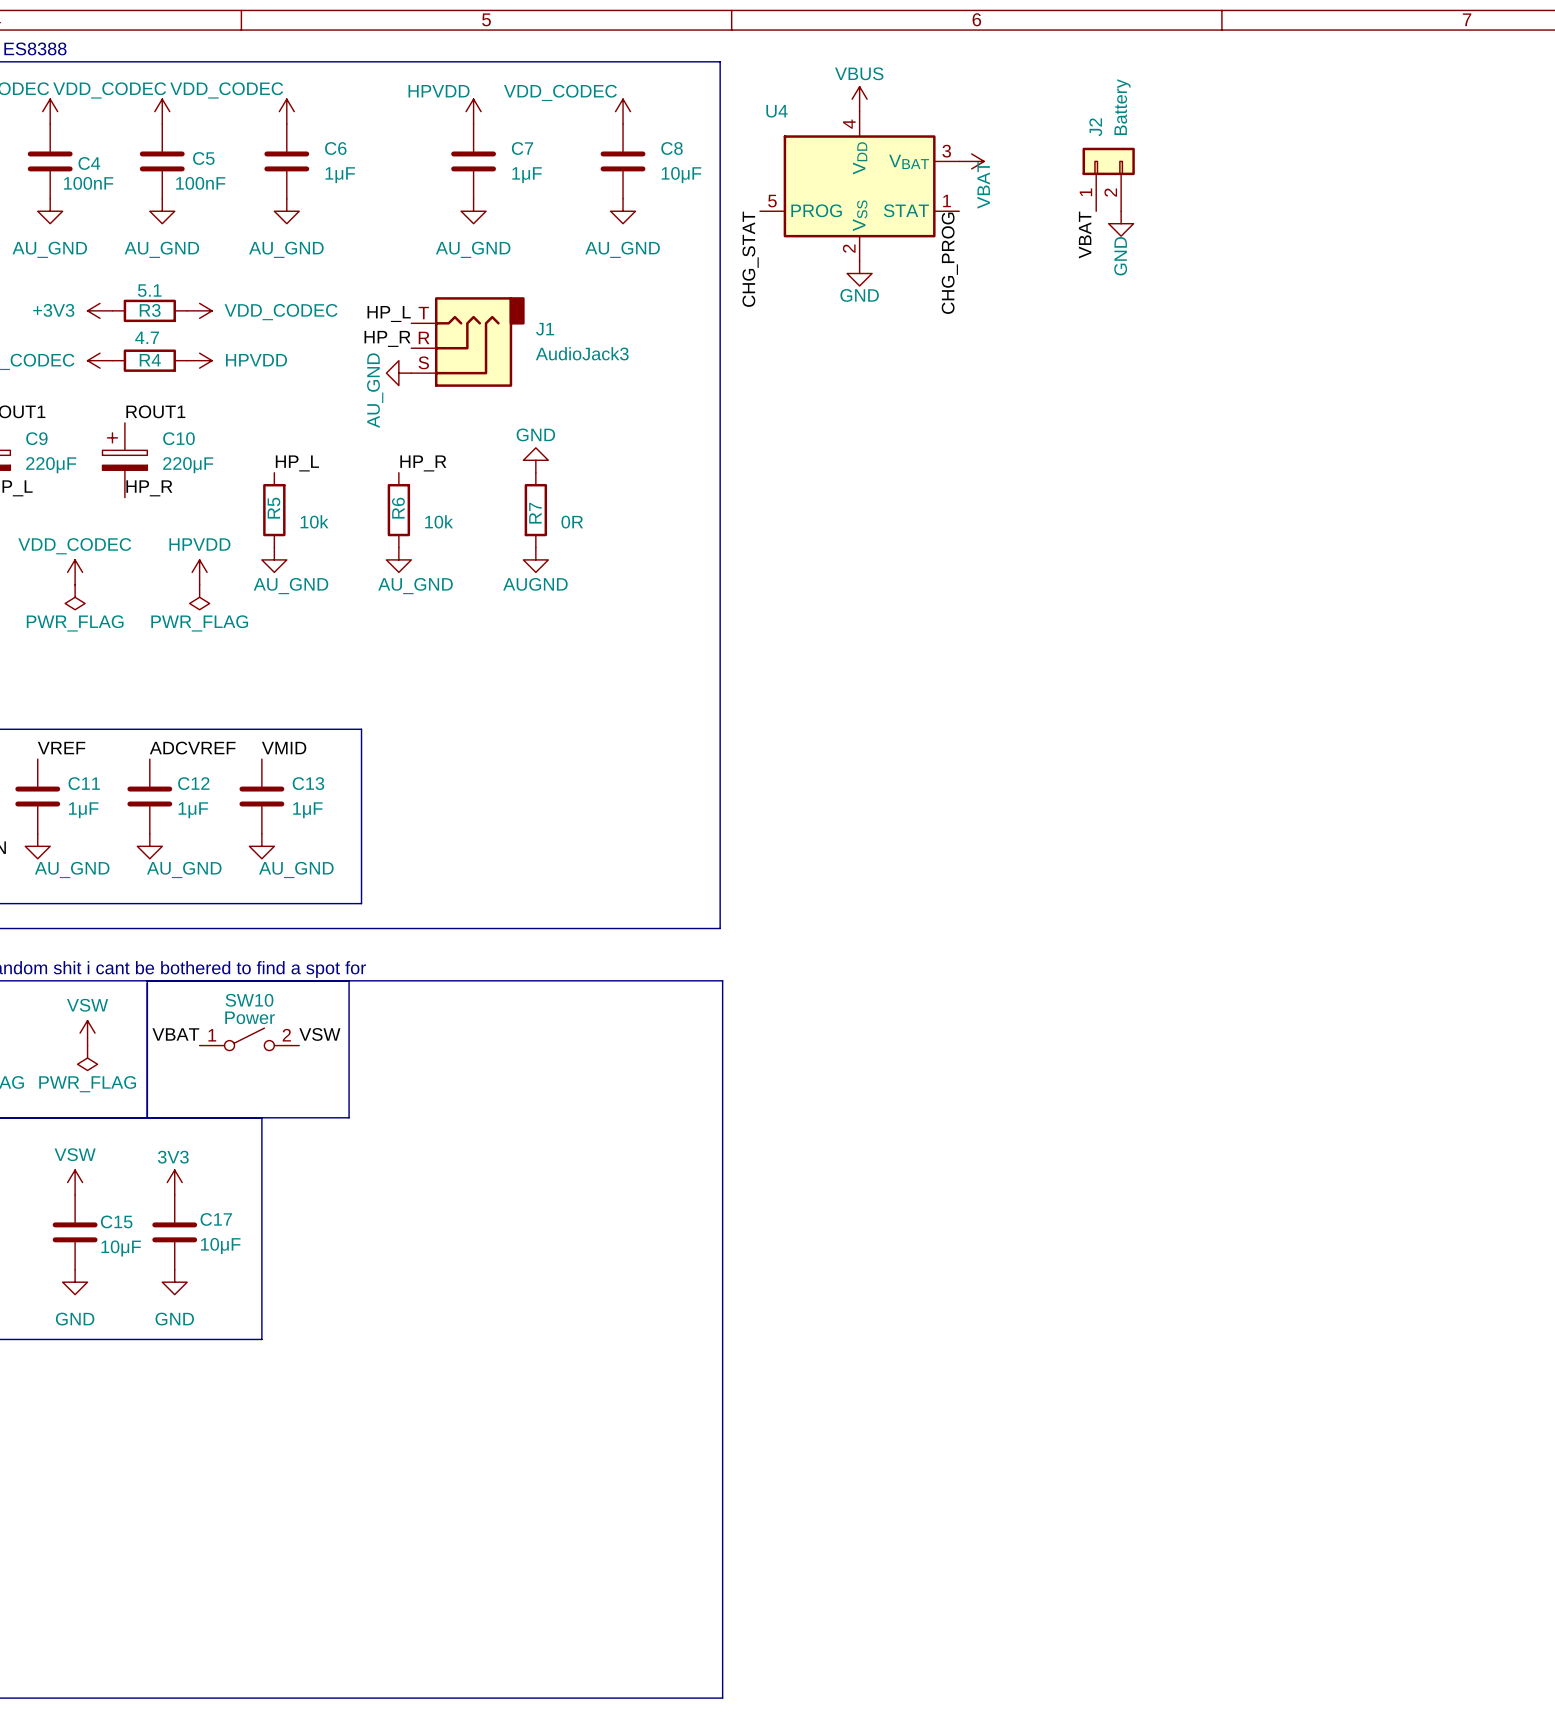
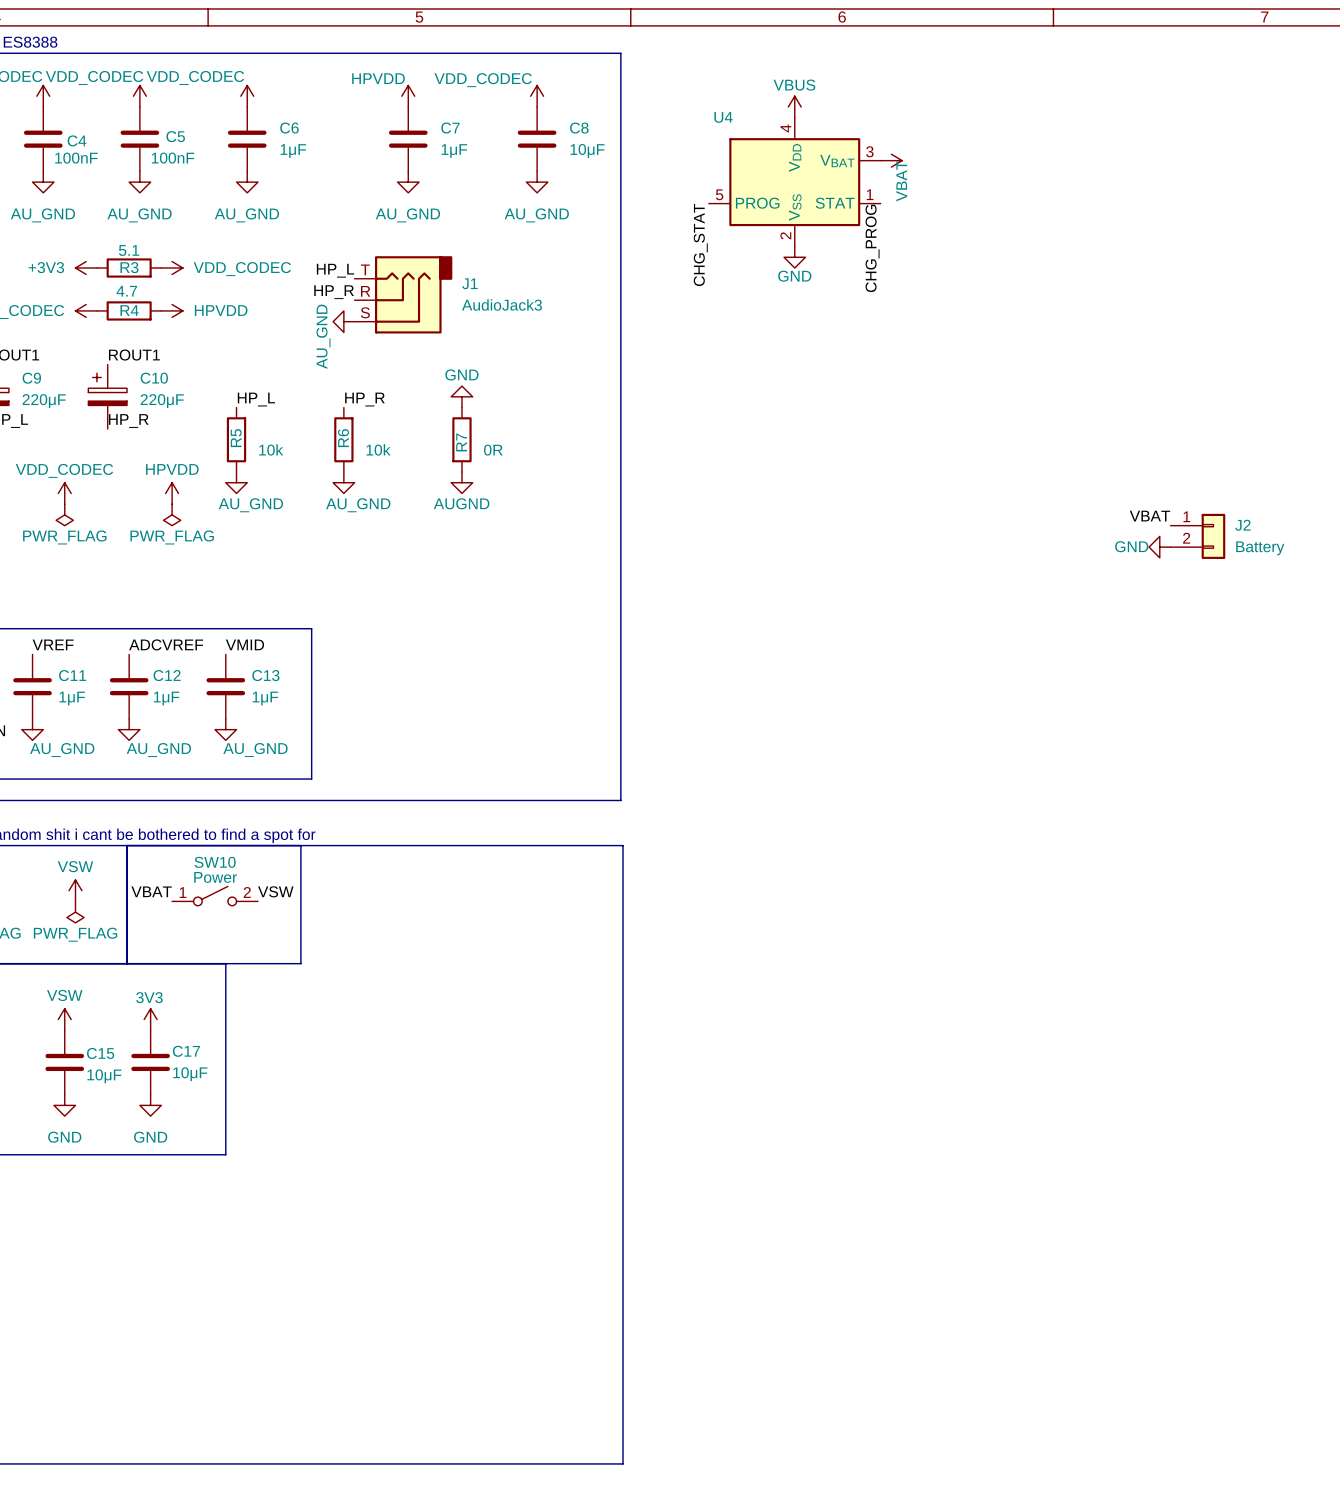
power symbol position: VBUS (859, 99) -> VBUS (794, 106)
power symbol position: VBAT (971, 161) -> VBAT (891, 160)
J2 rotation: 0° (1108, 161) -> 90° clockwise (1213, 536)
J2 position: (1108, 179) -> (1197, 536)
U4 position: (859, 186) -> (794, 182)
power symbol: GND (1121, 223) -> none
label: VBAT (1085, 235) -> none
label position: CHG_STAT (750, 259) -> CHG_STAT (700, 244)
label position: CHG_PROG (949, 263) -> CHG_PROG (872, 248)
power symbol position: GND (859, 273) -> GND (794, 257)
label: none -> VBAT (1149, 516)
power symbol: none -> GND (1159, 547)

